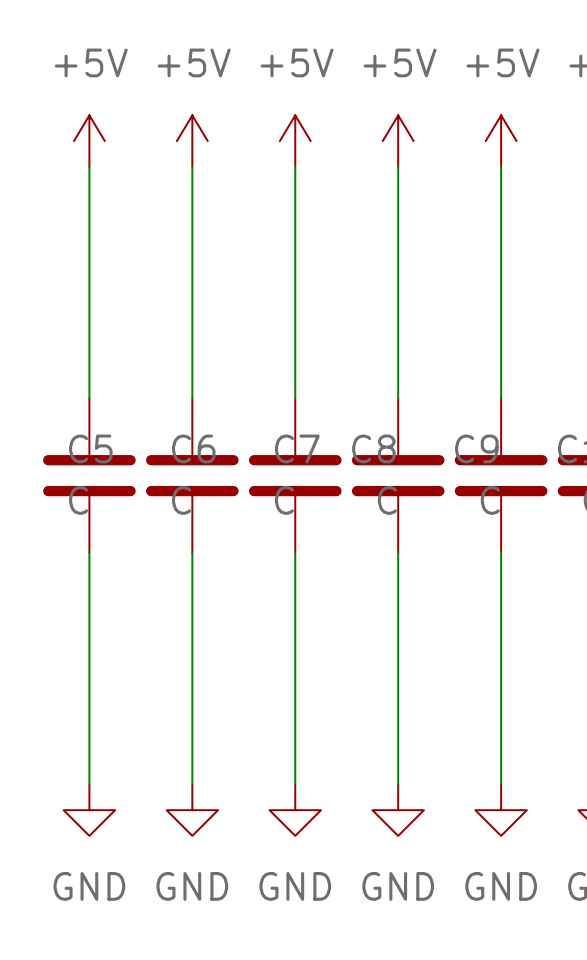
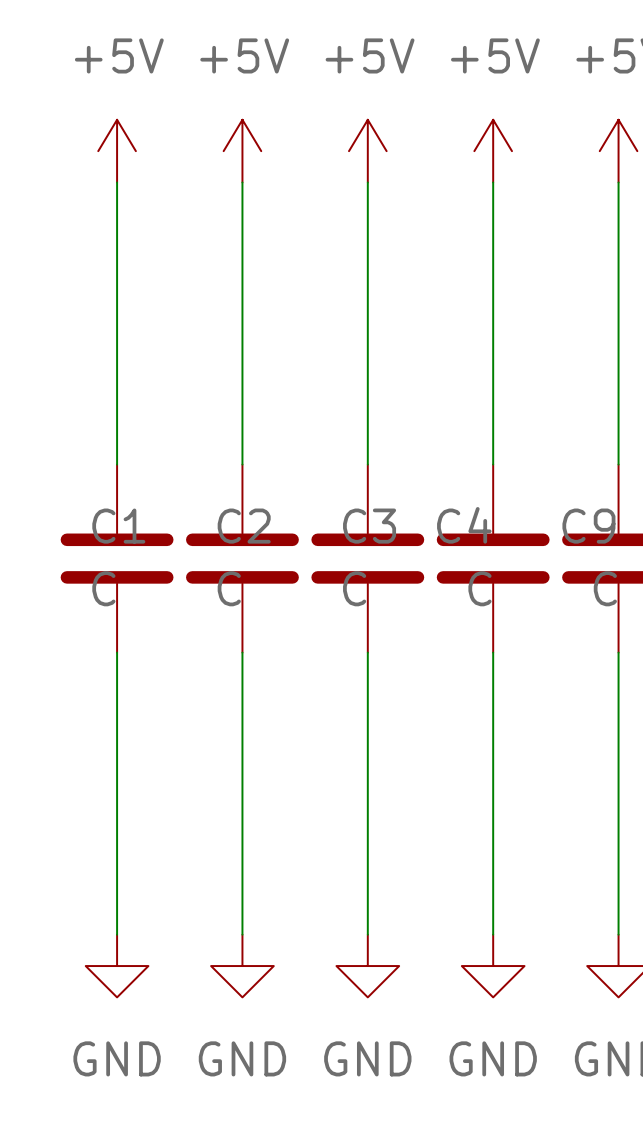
C5 name: C5 (90, 448) -> C1 (118, 526)
C6 name: C6 (193, 448) -> C2 (244, 526)
C7 name: C7 (297, 448) -> C3 (369, 526)
C8 name: C8 (373, 448) -> C4 (464, 525)

